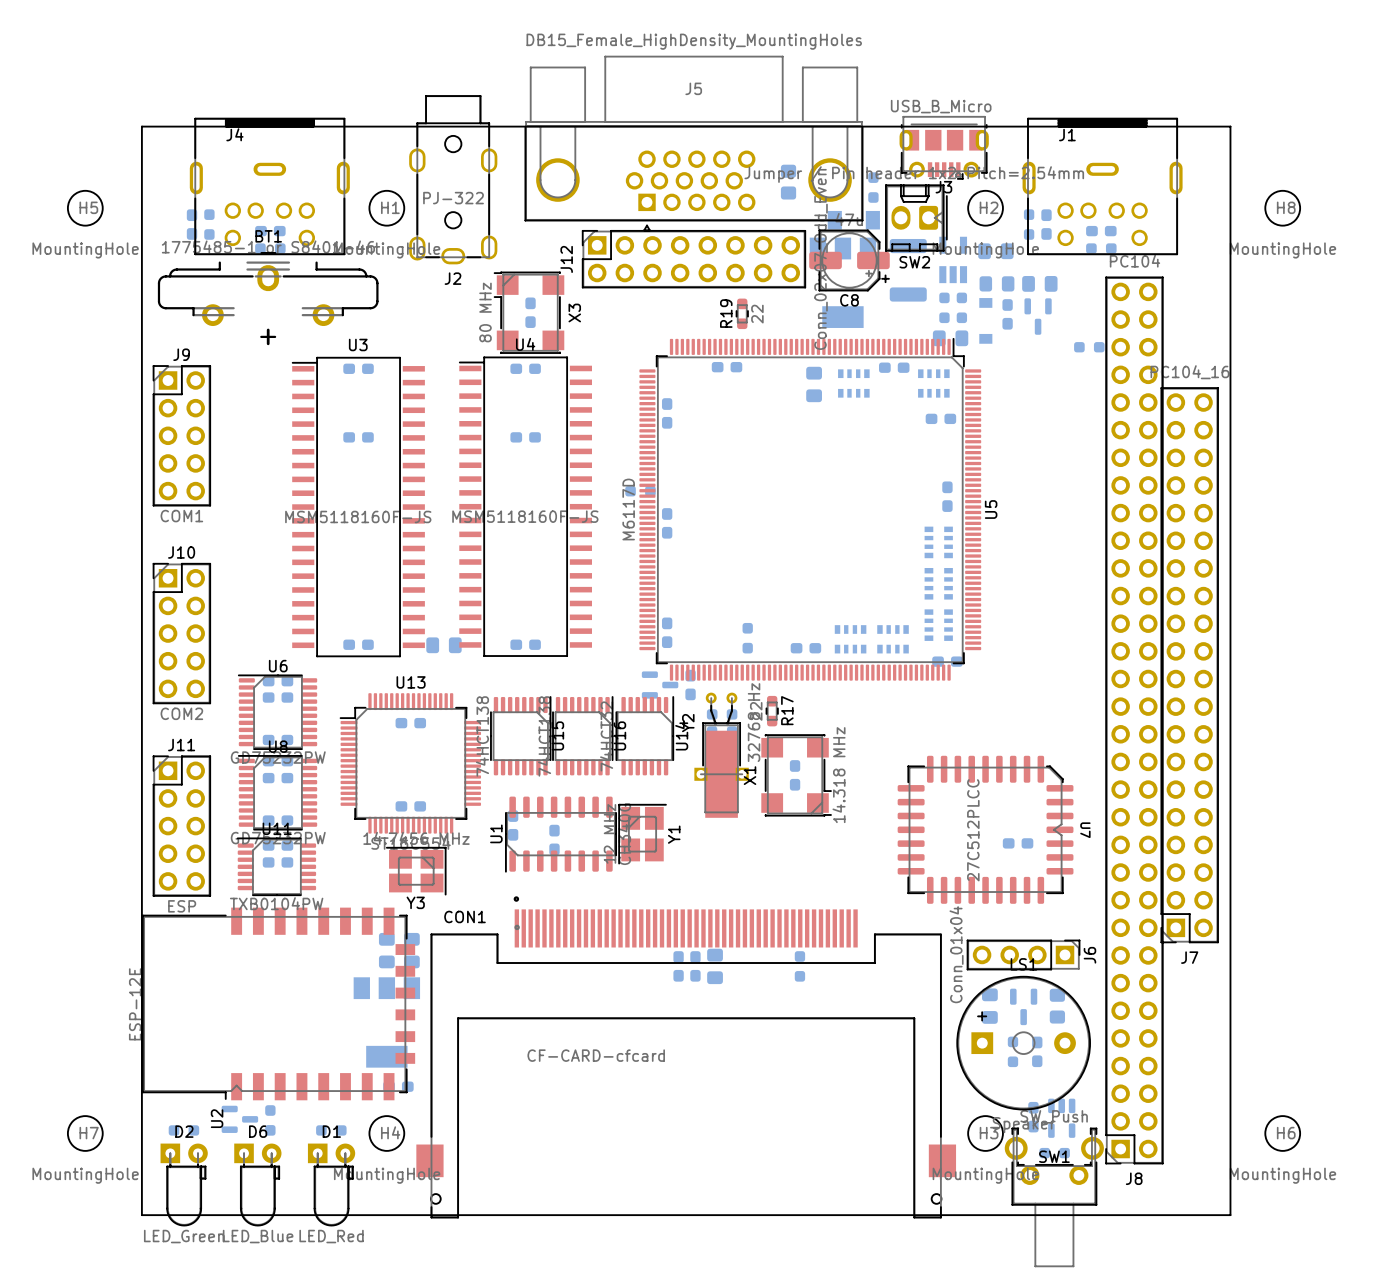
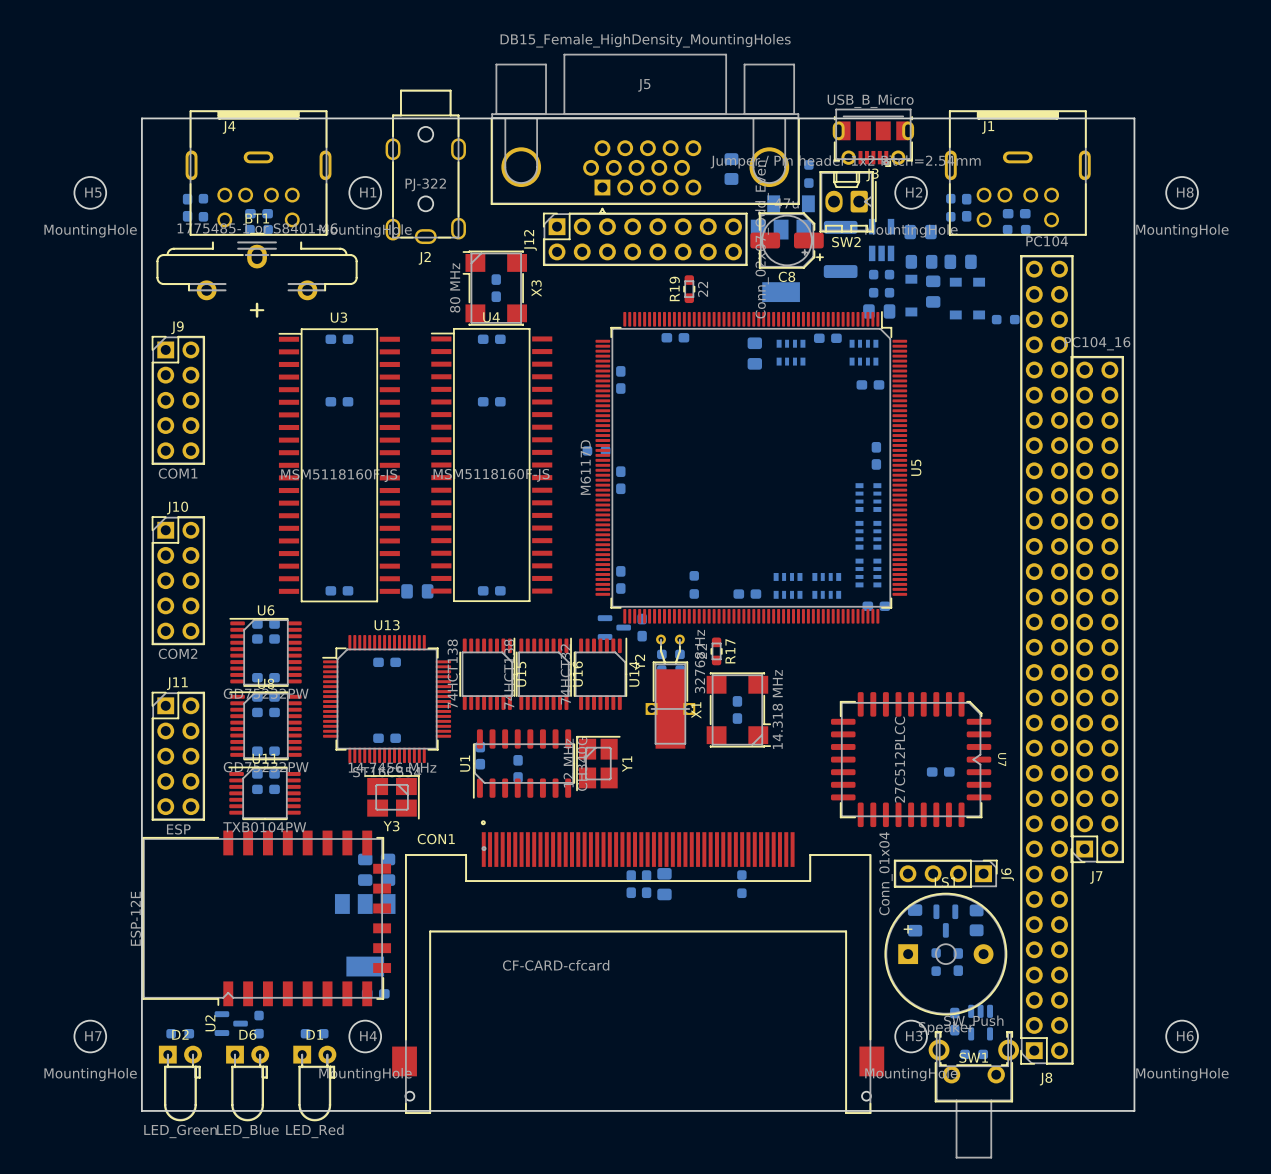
part footprint: [1024, 298, 1052, 335] -> [949, 277, 962, 320]
part footprint: [1002, 299, 1013, 330] -> [926, 275, 941, 308]
part: none -> (979, 298)

